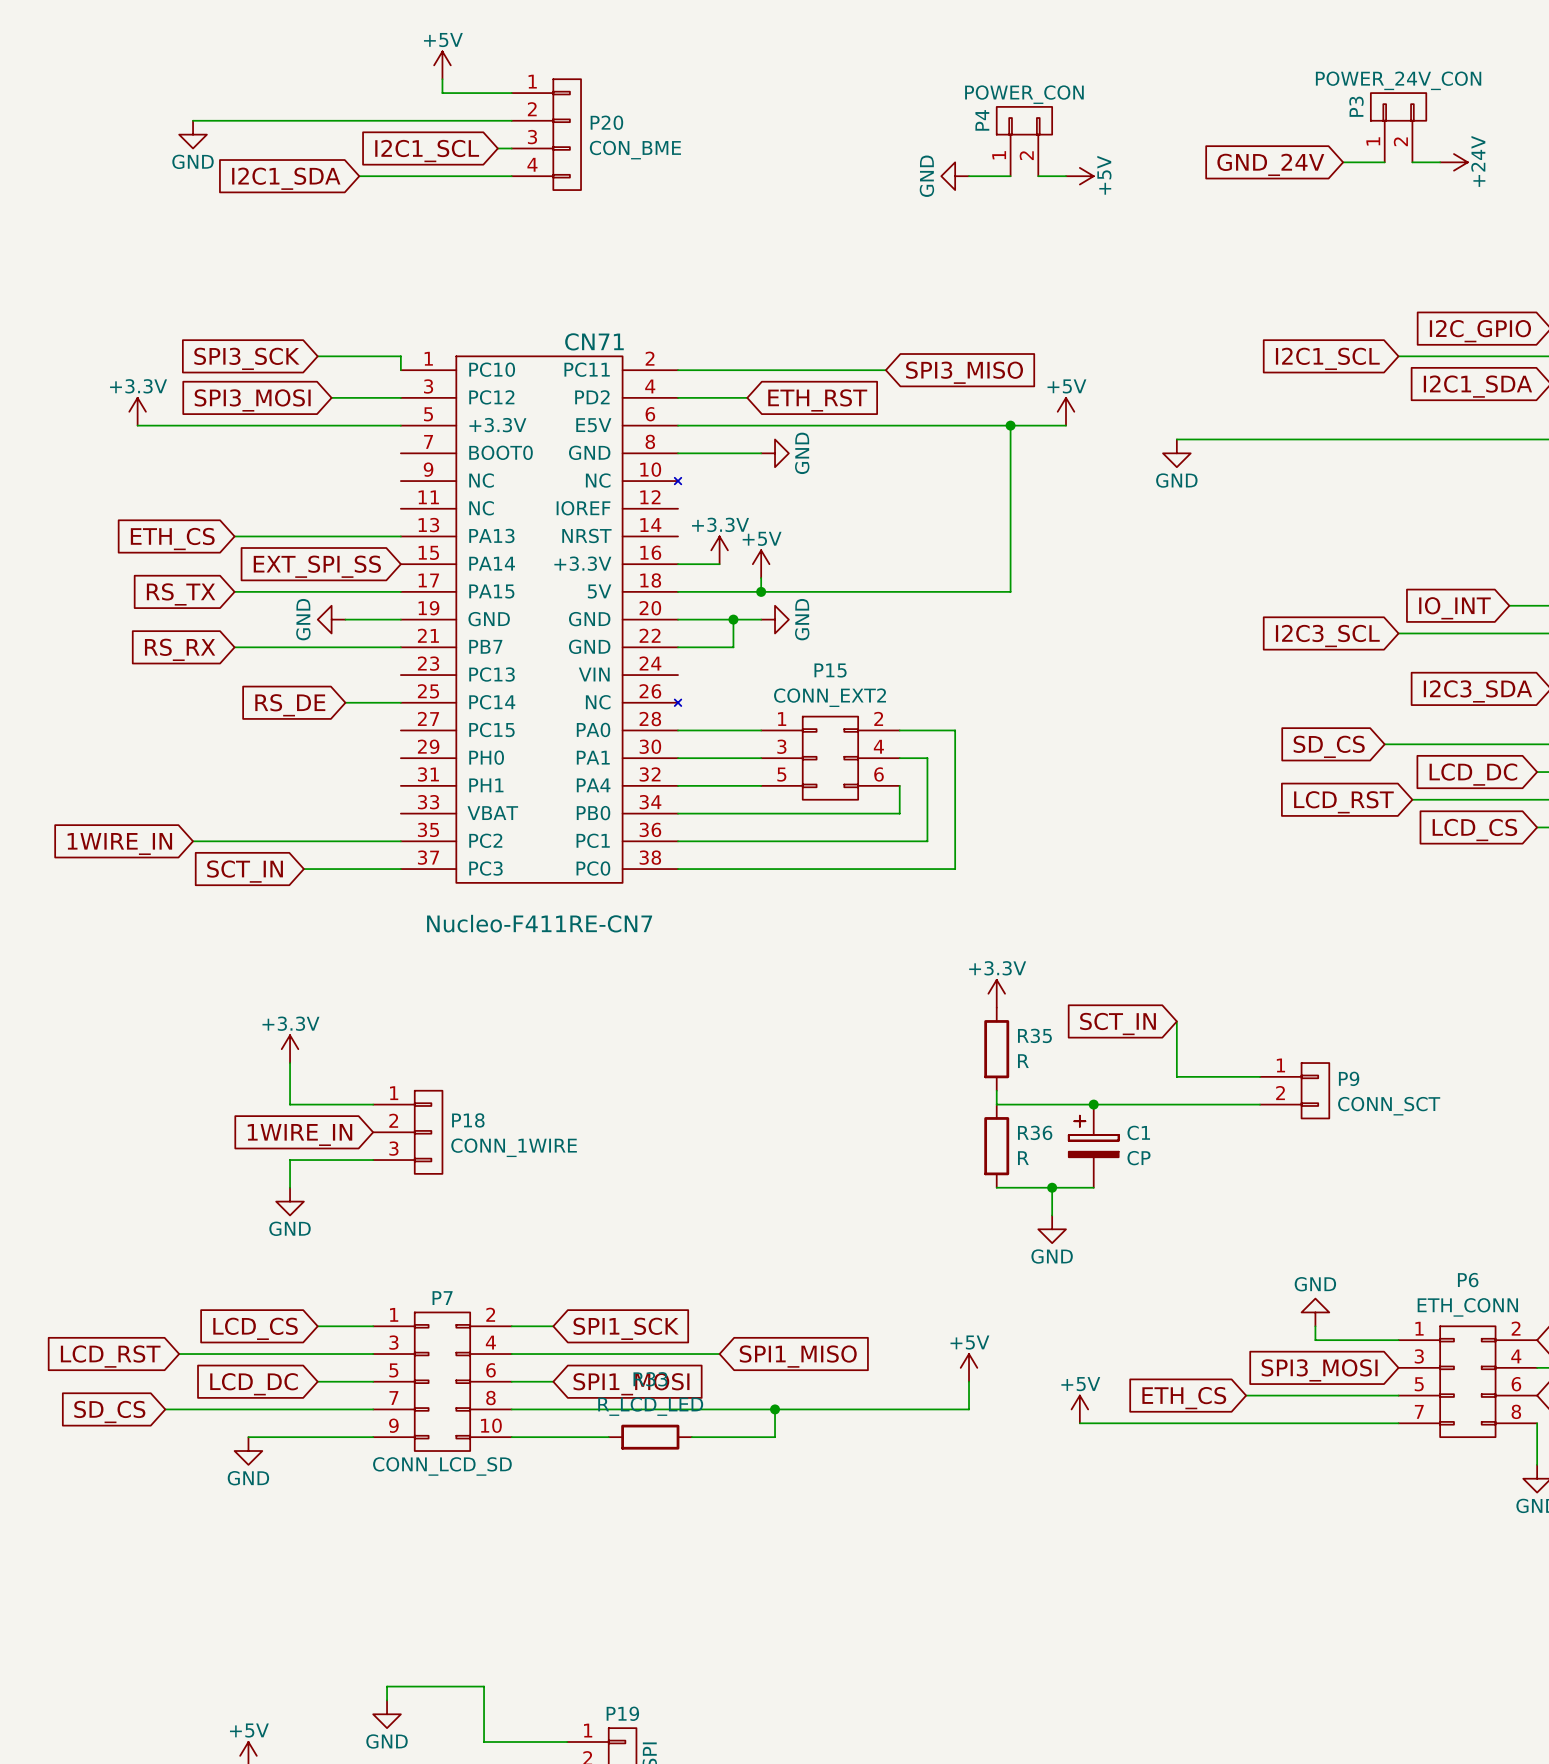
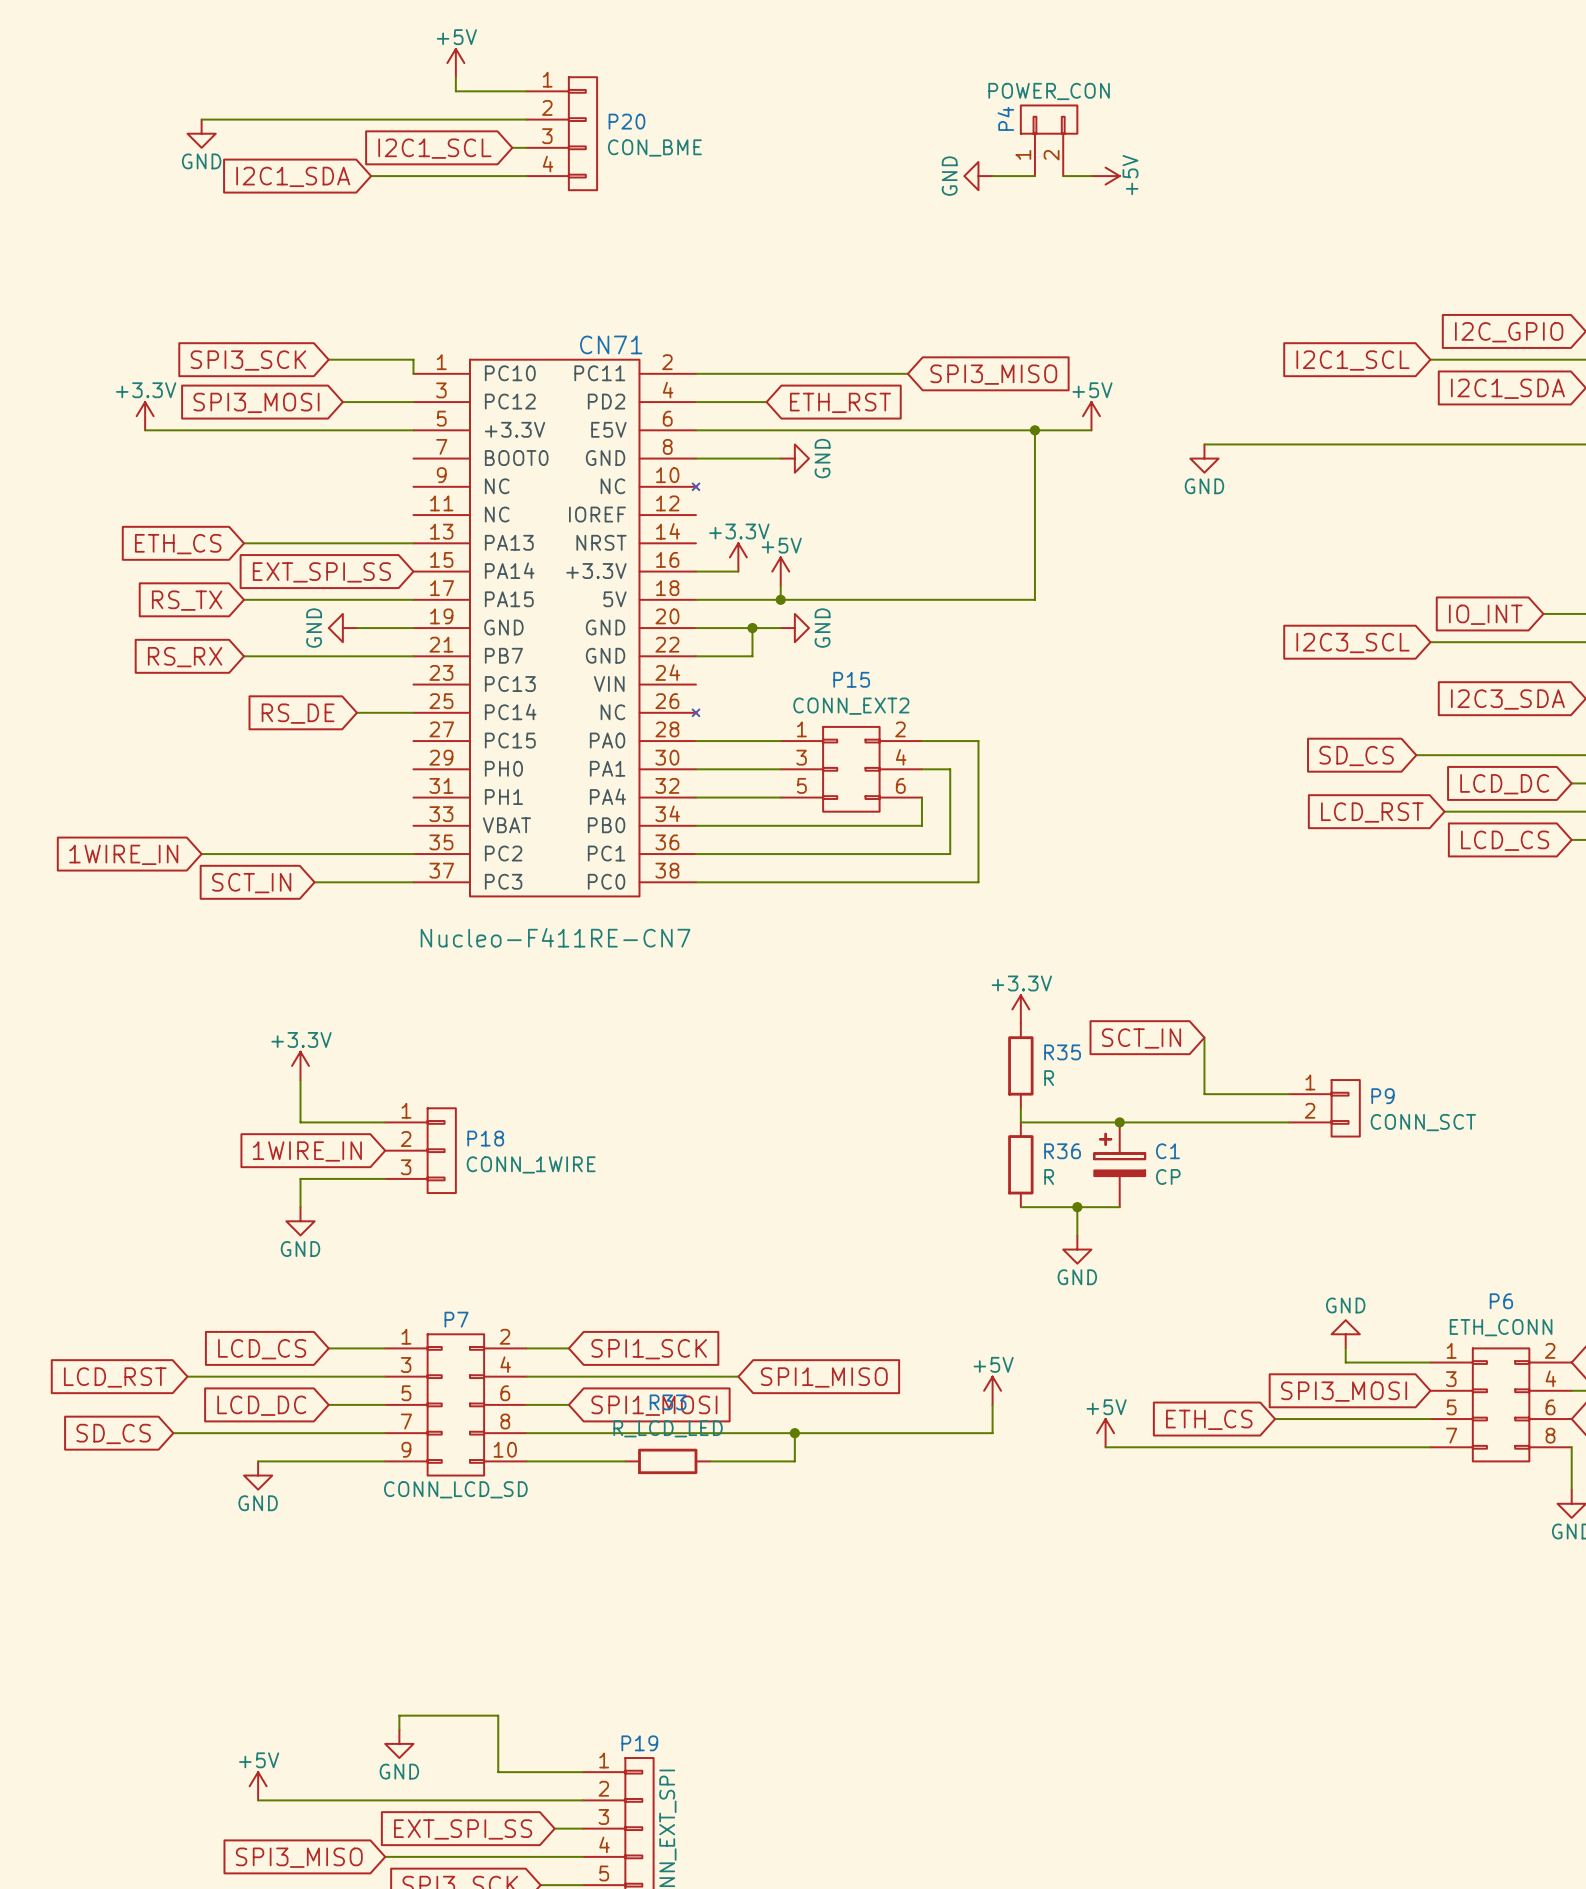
P3: POWER_24V_CON (1398, 127) -> none
wire: (1343, 162) (1384, 162) -> none
wire: (1412, 162) (1440, 162) -> none
power symbol: +24V (1453, 162) -> none
global label: GND_24V (1270, 164) -> none

